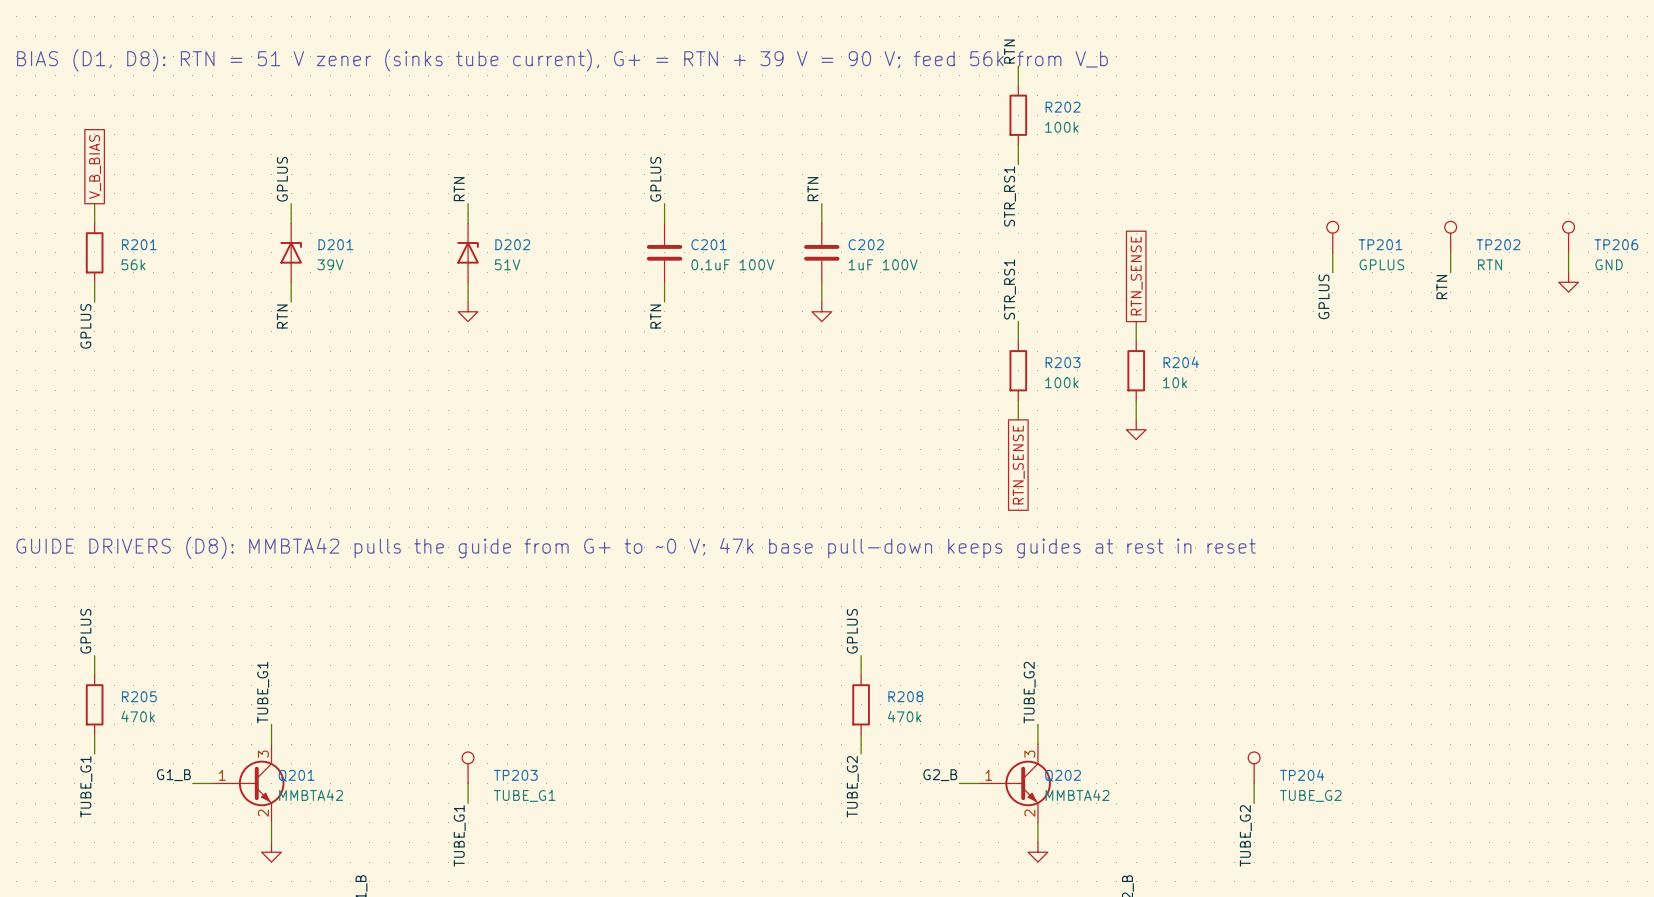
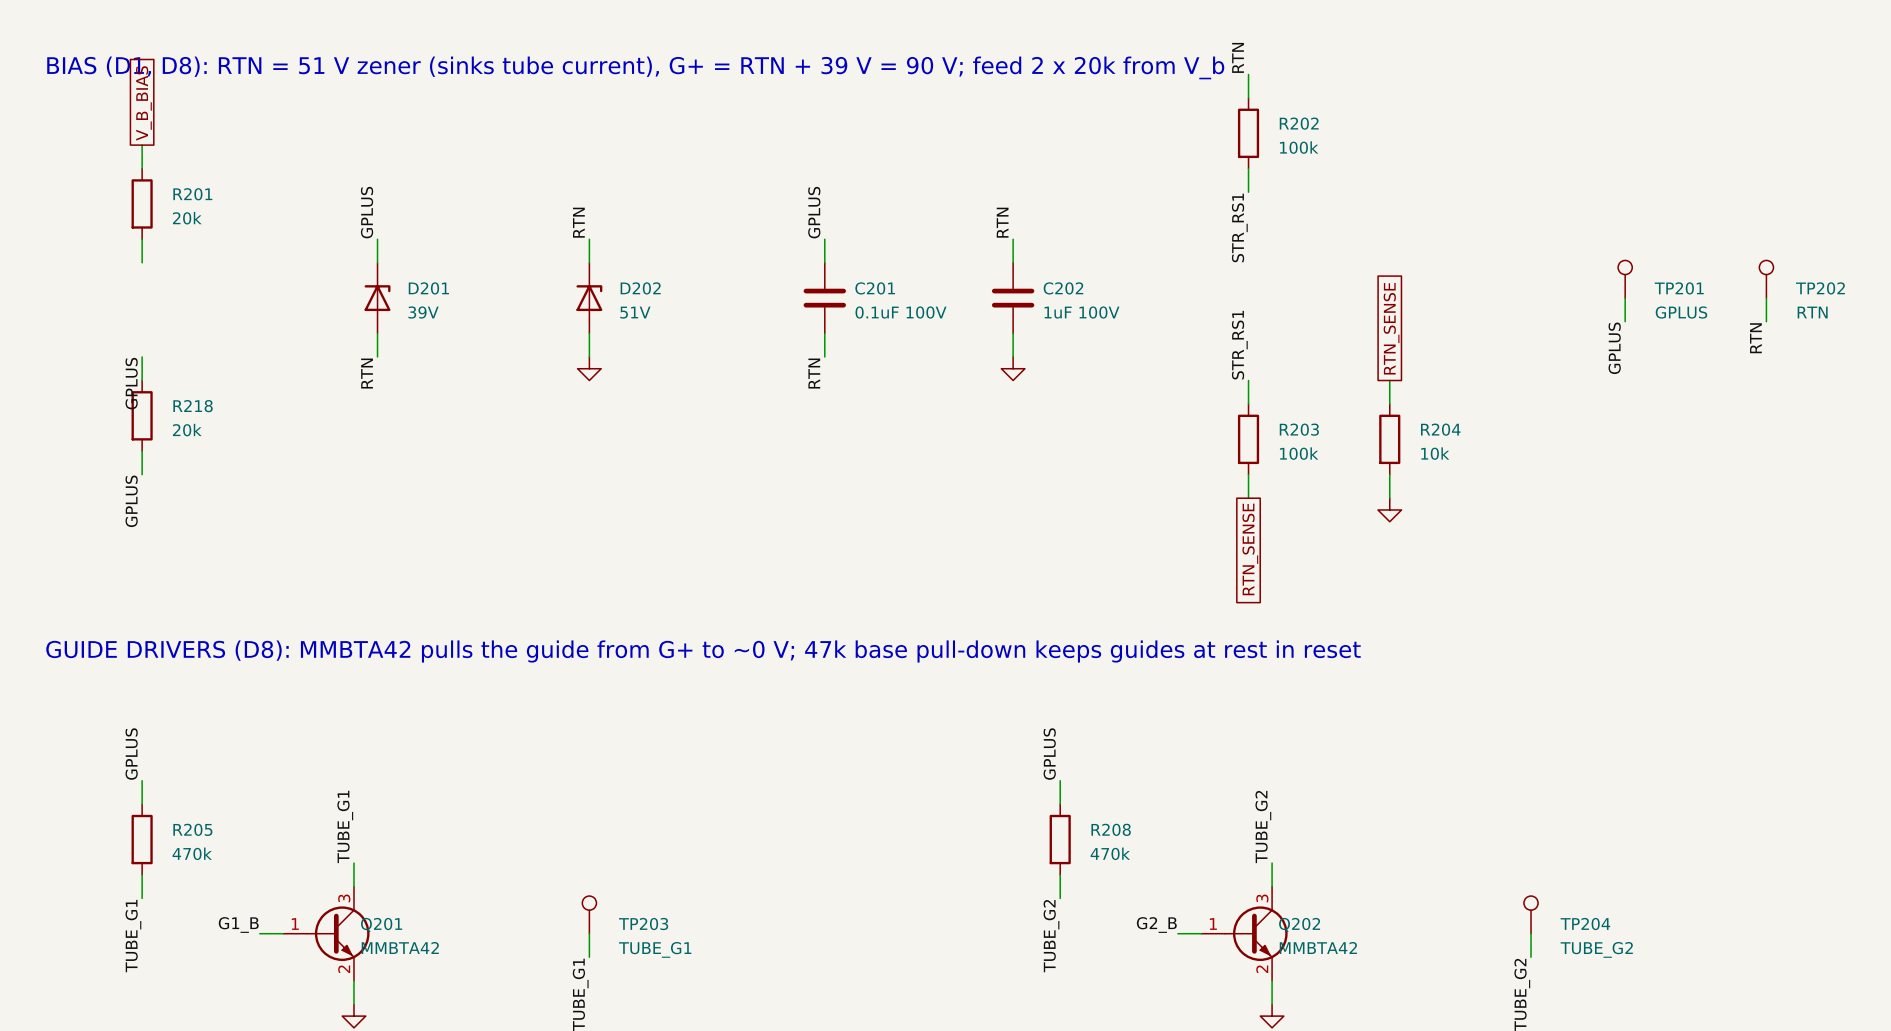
text: BIAS (D1, D8): RTN = 51 V zener (sinks tube current), G+ = RTN + 39 V = 90 V; feed 56k from V_b (562, 60) -> BIAS (D1, D8): RTN = 51 V zener (sinks tube current), G+ = RTN + 39 V = 90 V; feed 2 x 20k from V_b (635, 67)
wire: none -> (142, 145) (142, 168)
global label position: V_B_BIAS (95, 166) -> V_B_BIAS (143, 103)
R201 position: (94, 252) -> (142, 203)
R201 value: 56k (133, 264) -> 20k (187, 218)
wire: (94, 282) (94, 301) -> (142, 380) (142, 356)
R218: none -> 20k (142, 415)
wire: none -> (142, 451) (142, 474)
label: none -> GPLUS (131, 501)

